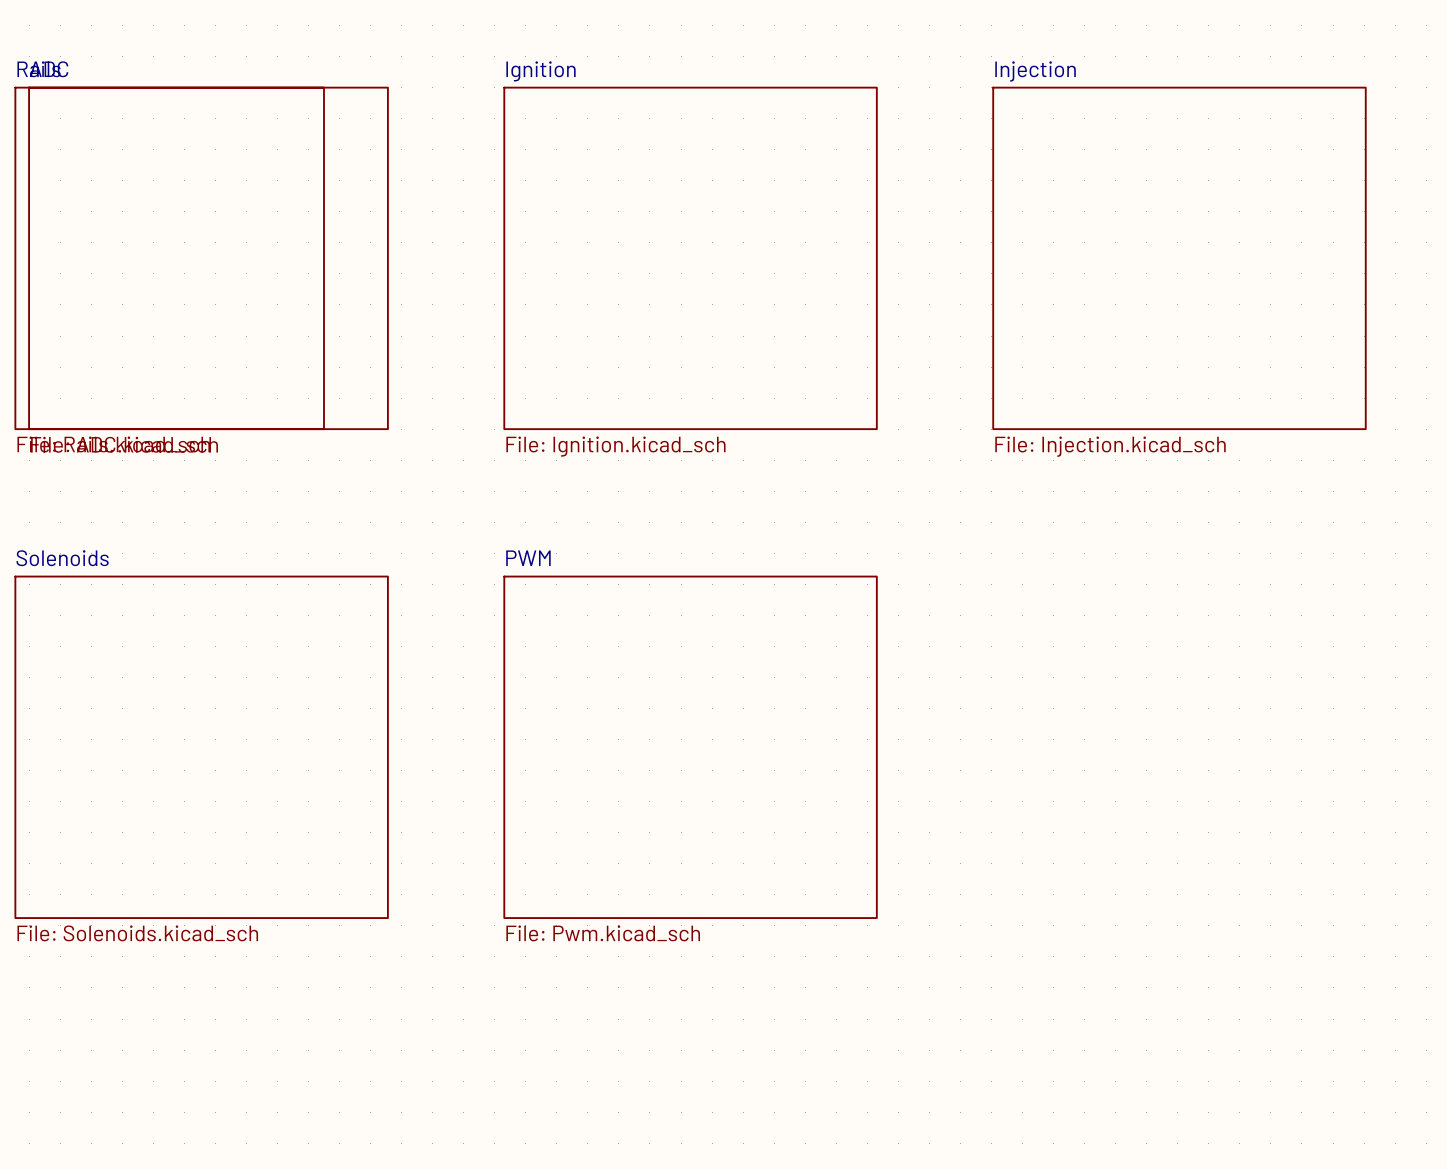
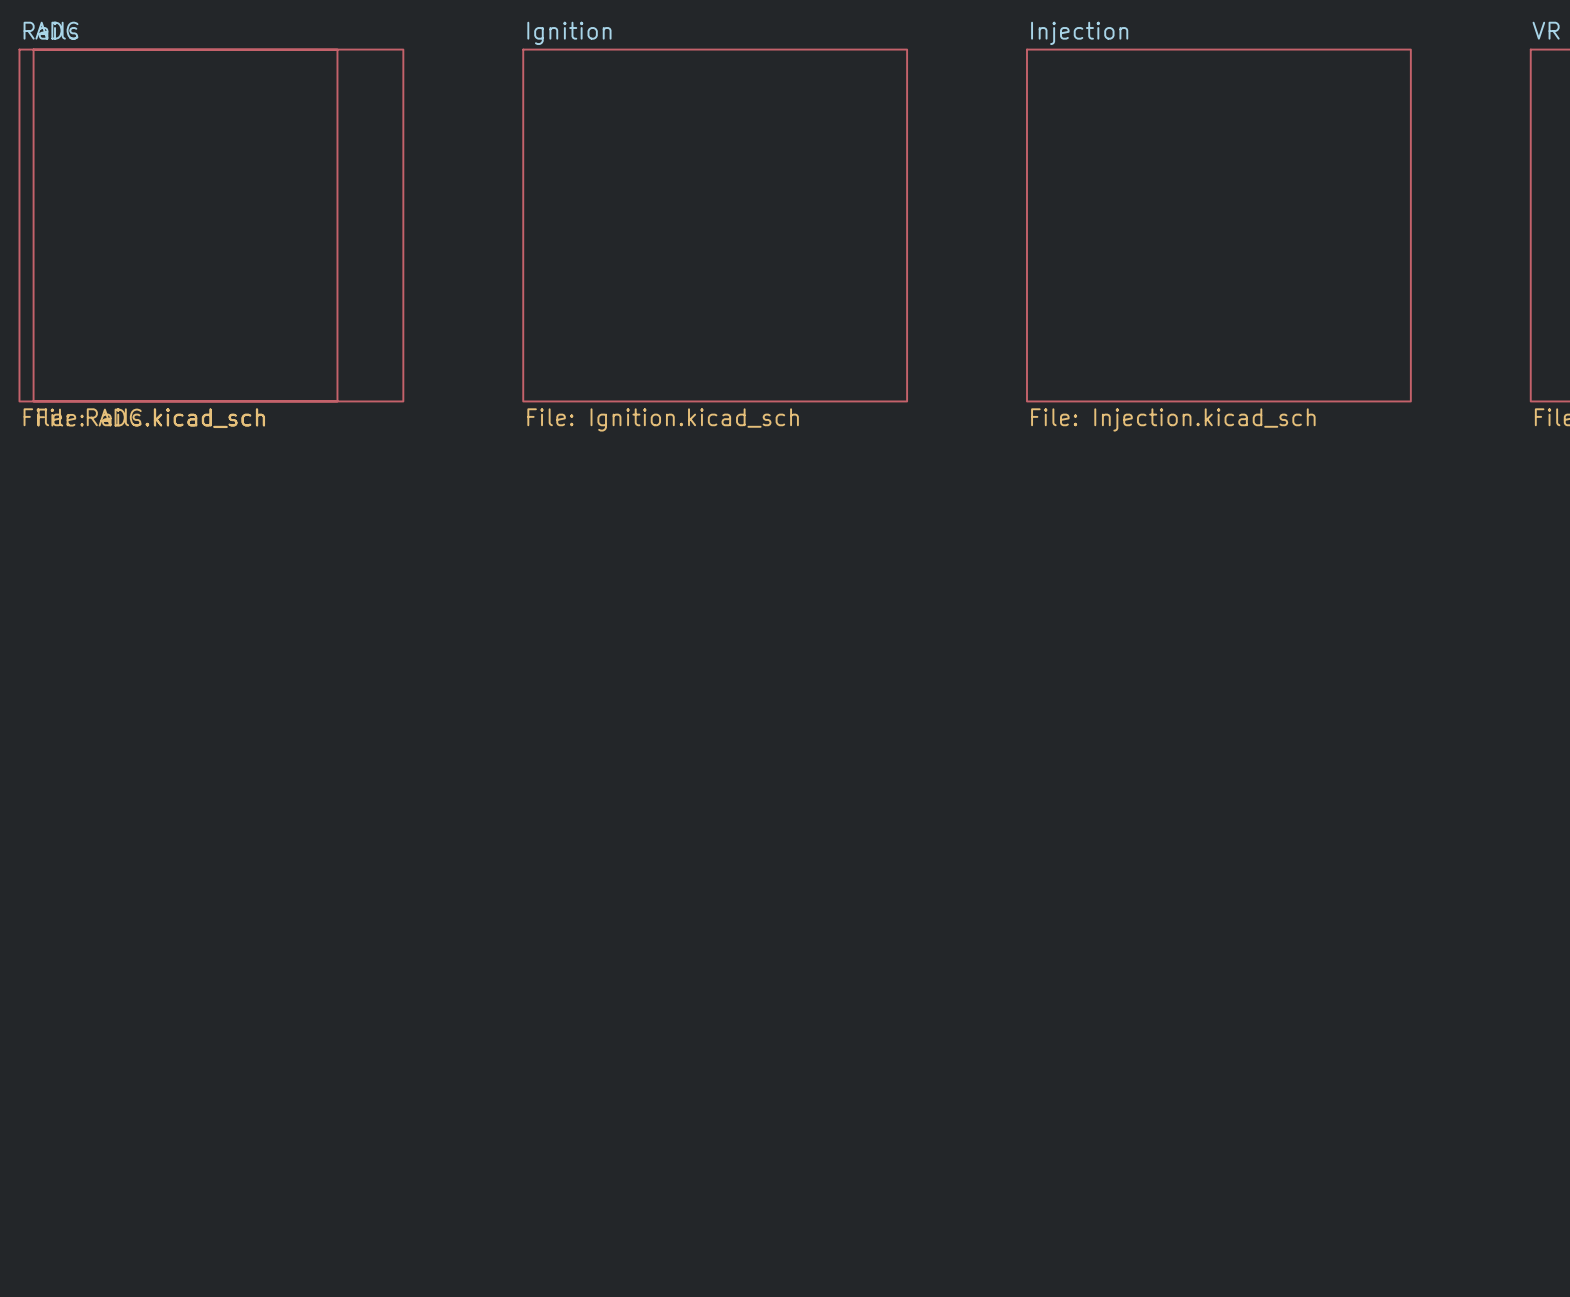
sheet Solenoids: File: Solenoids.kicad_sch (201, 747) -> none
sheet PWM: File: Pwm.kicad_sch (690, 747) -> none

